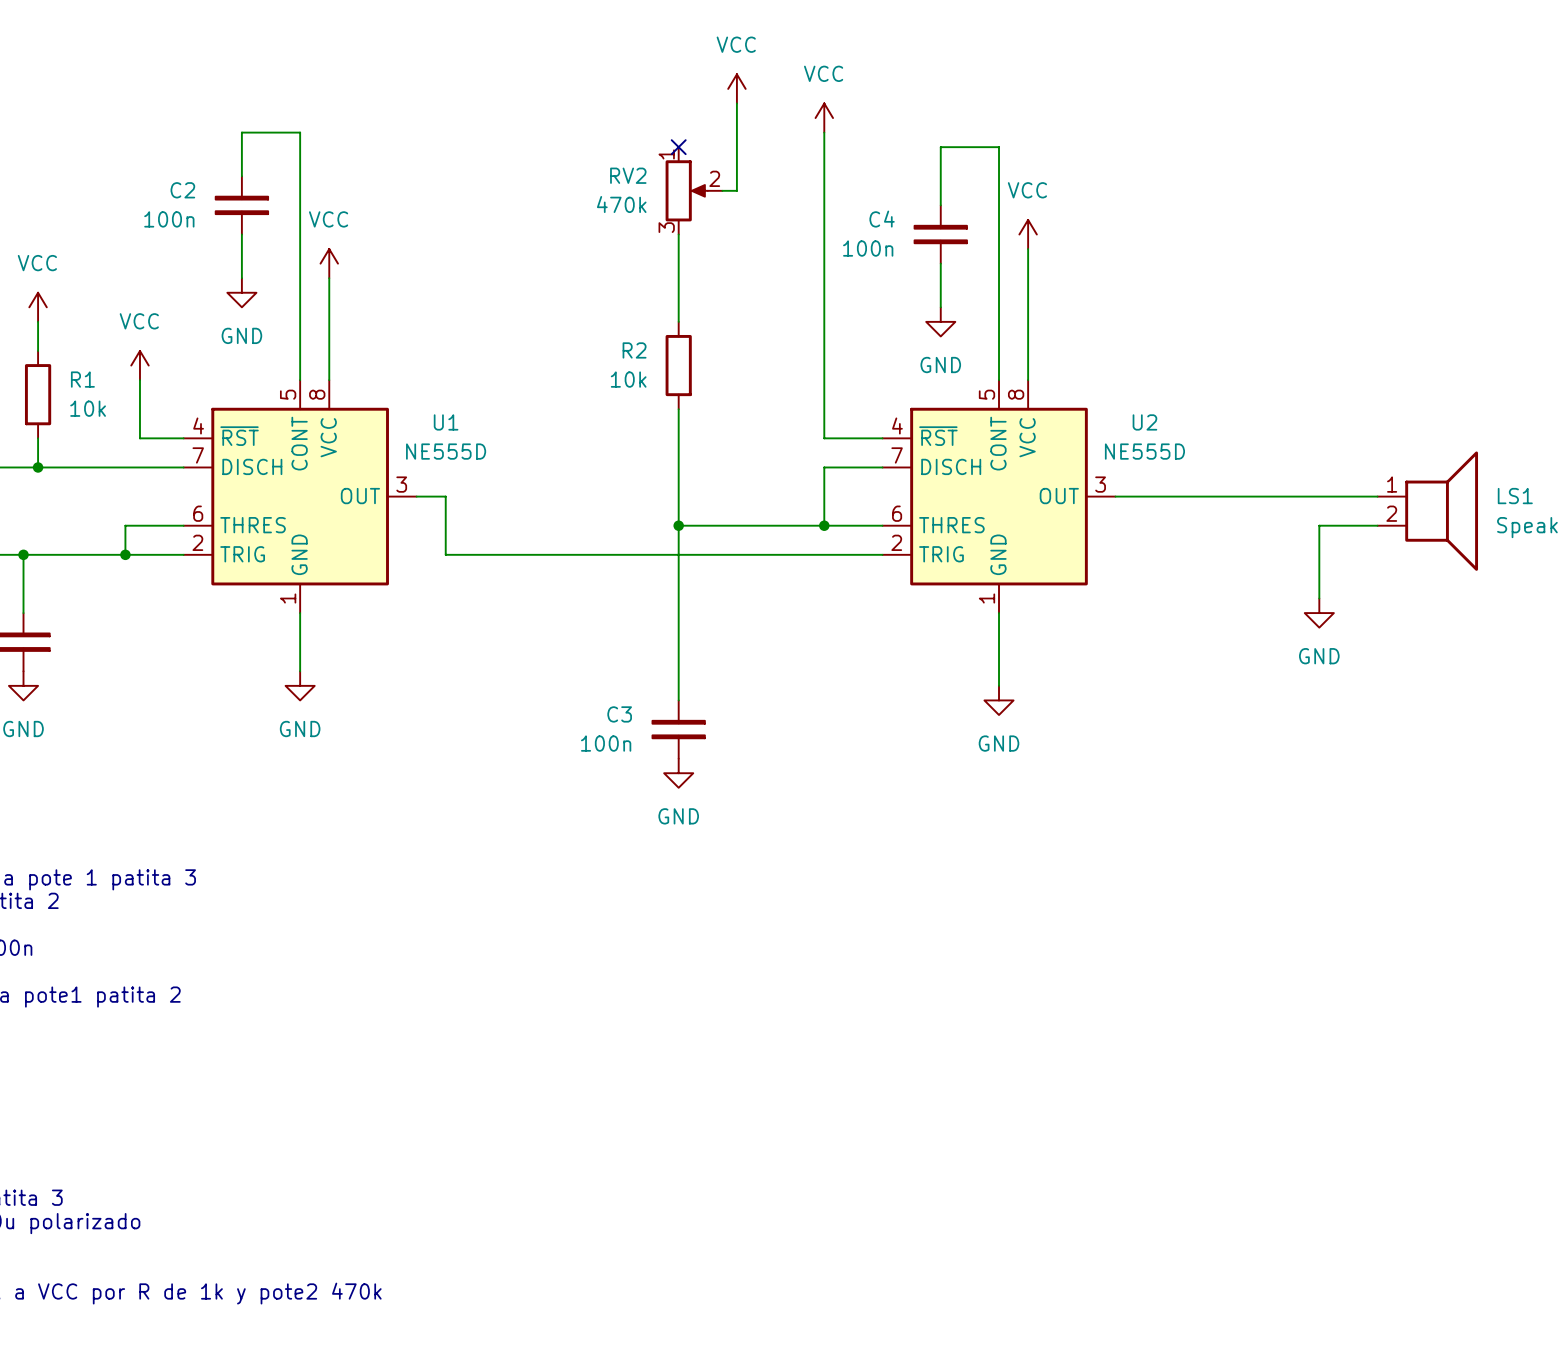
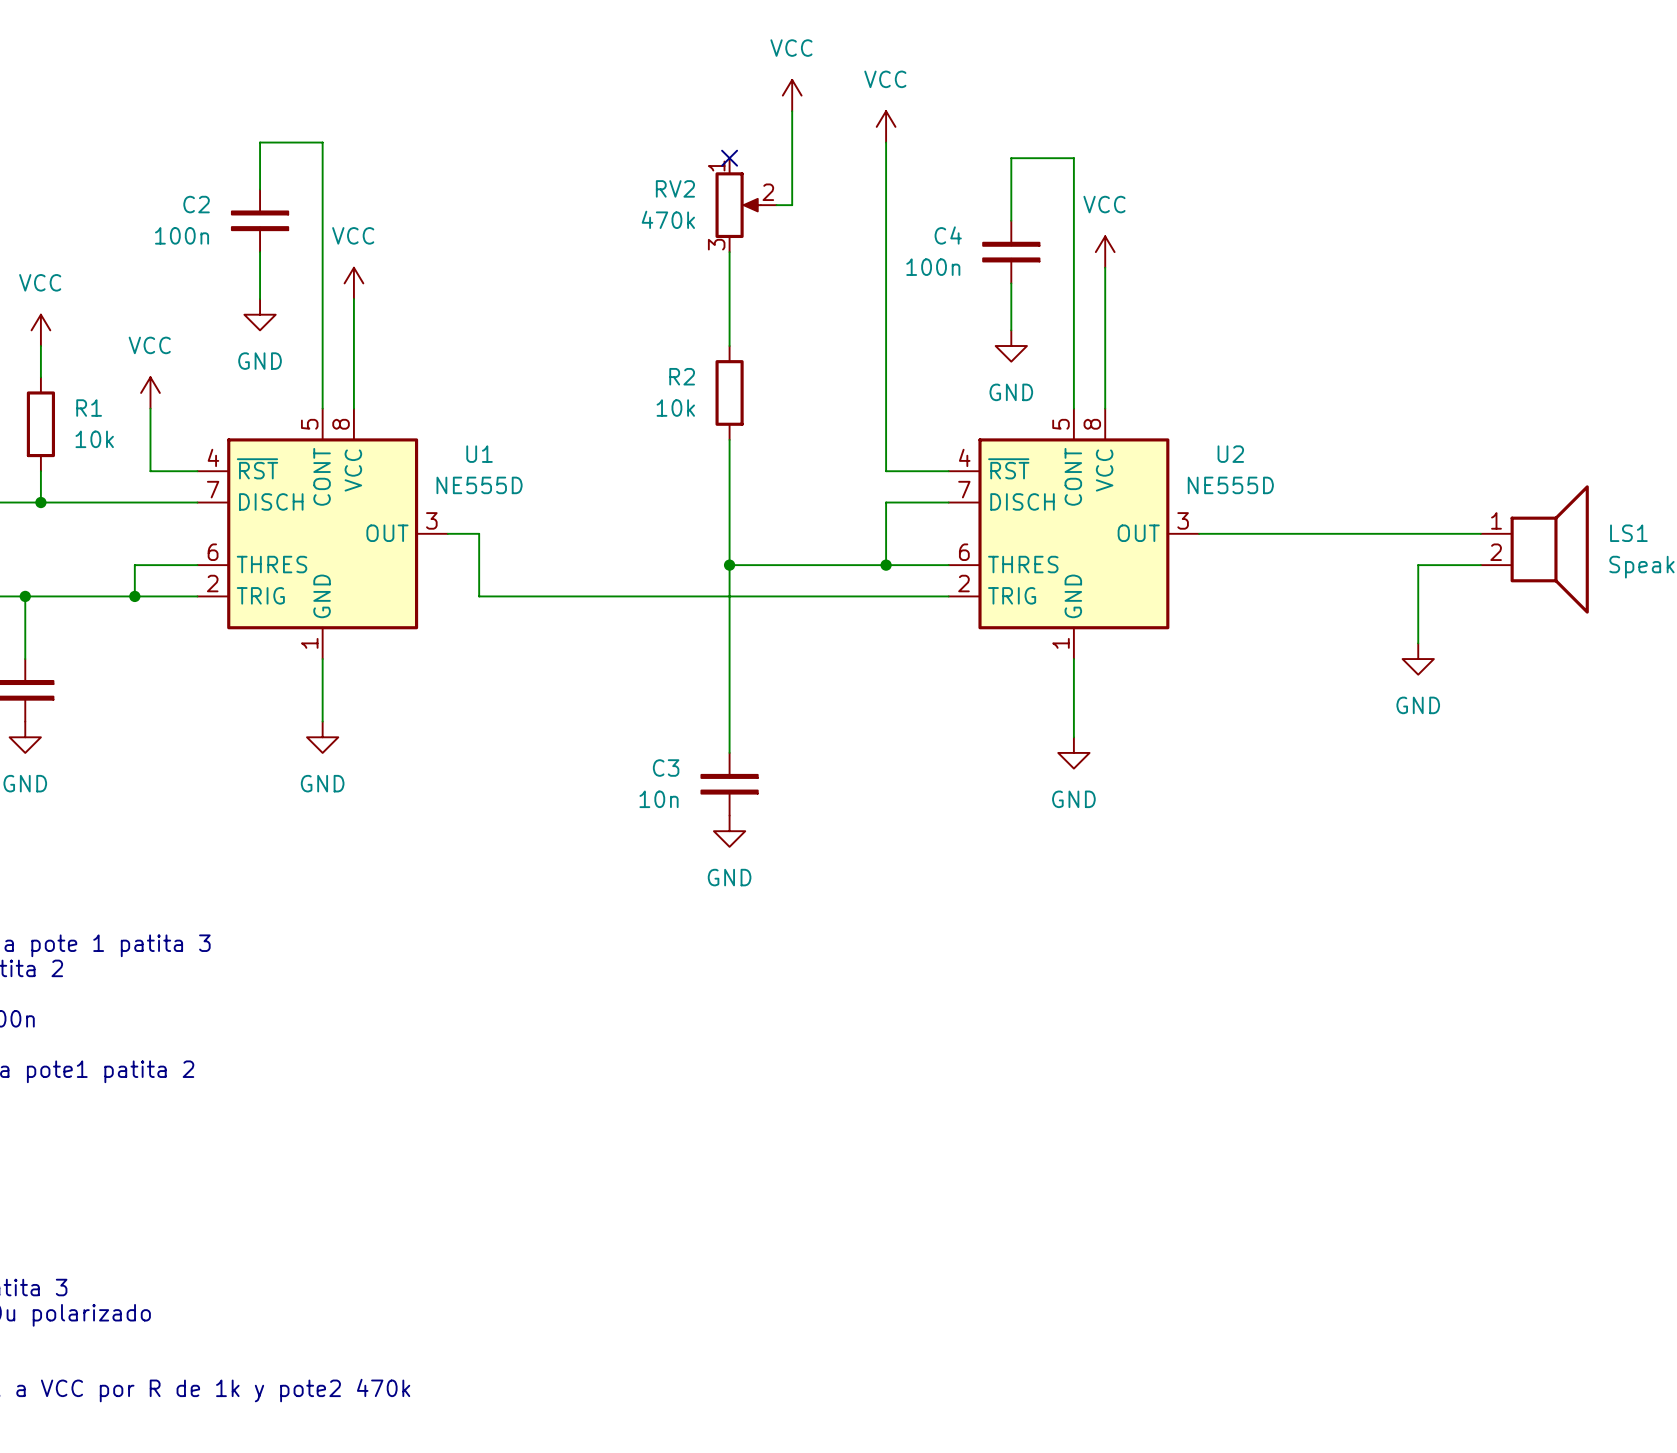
C3 value: 100n (606, 743) -> 10n (659, 799)

